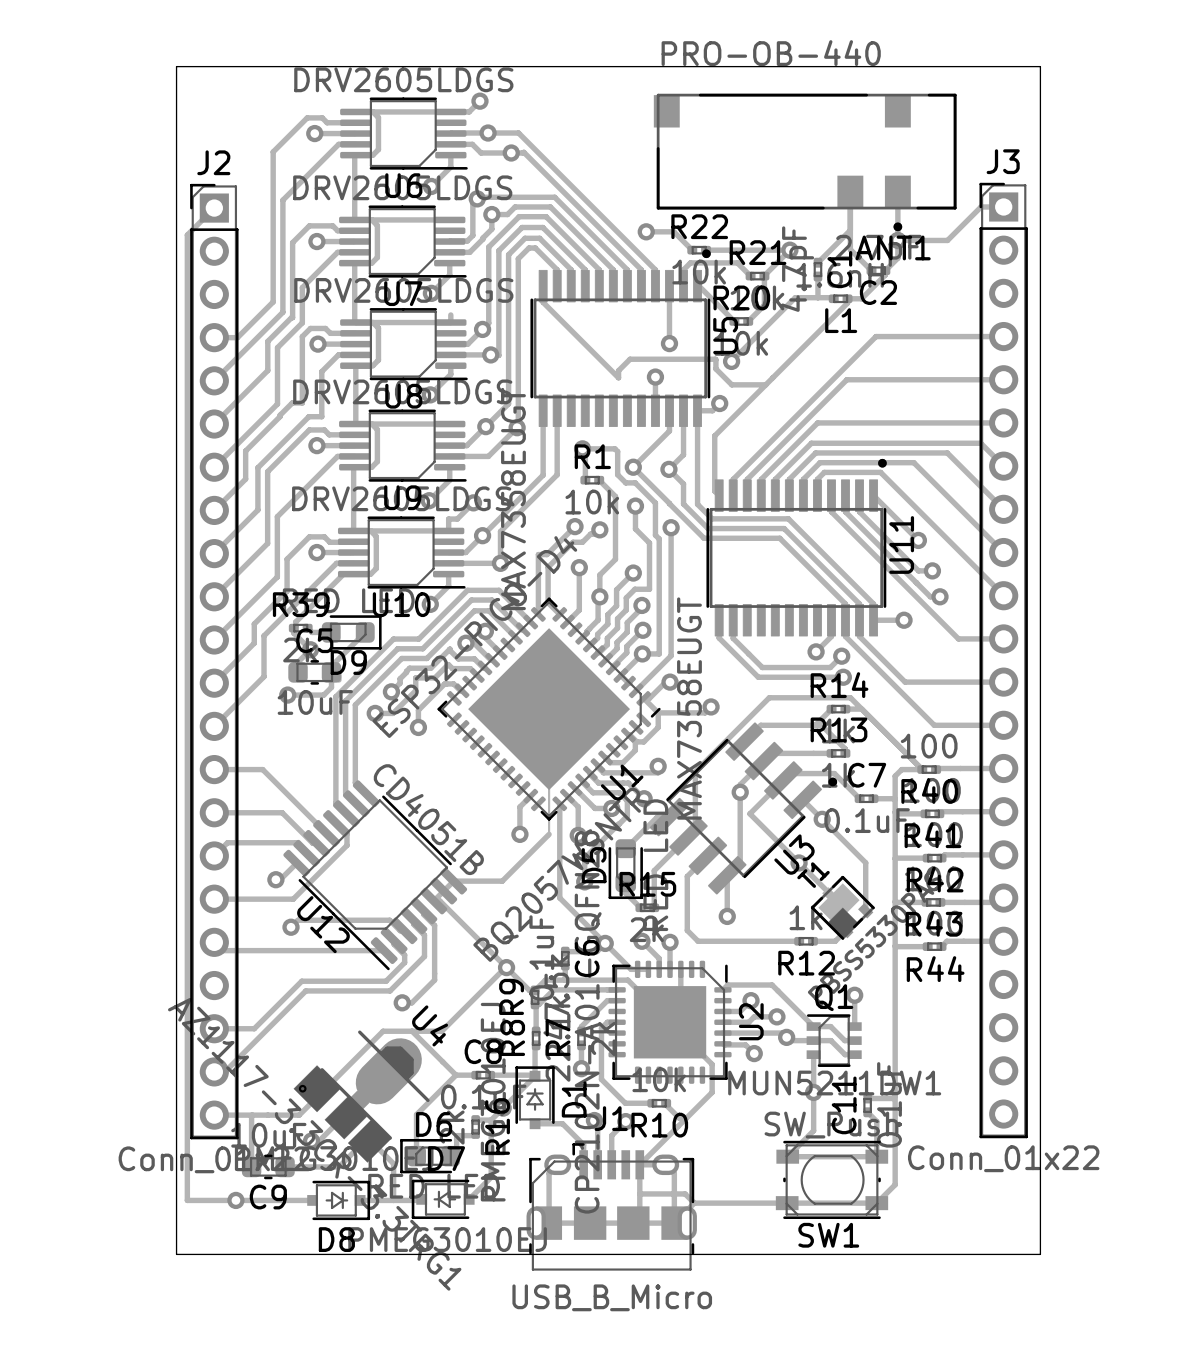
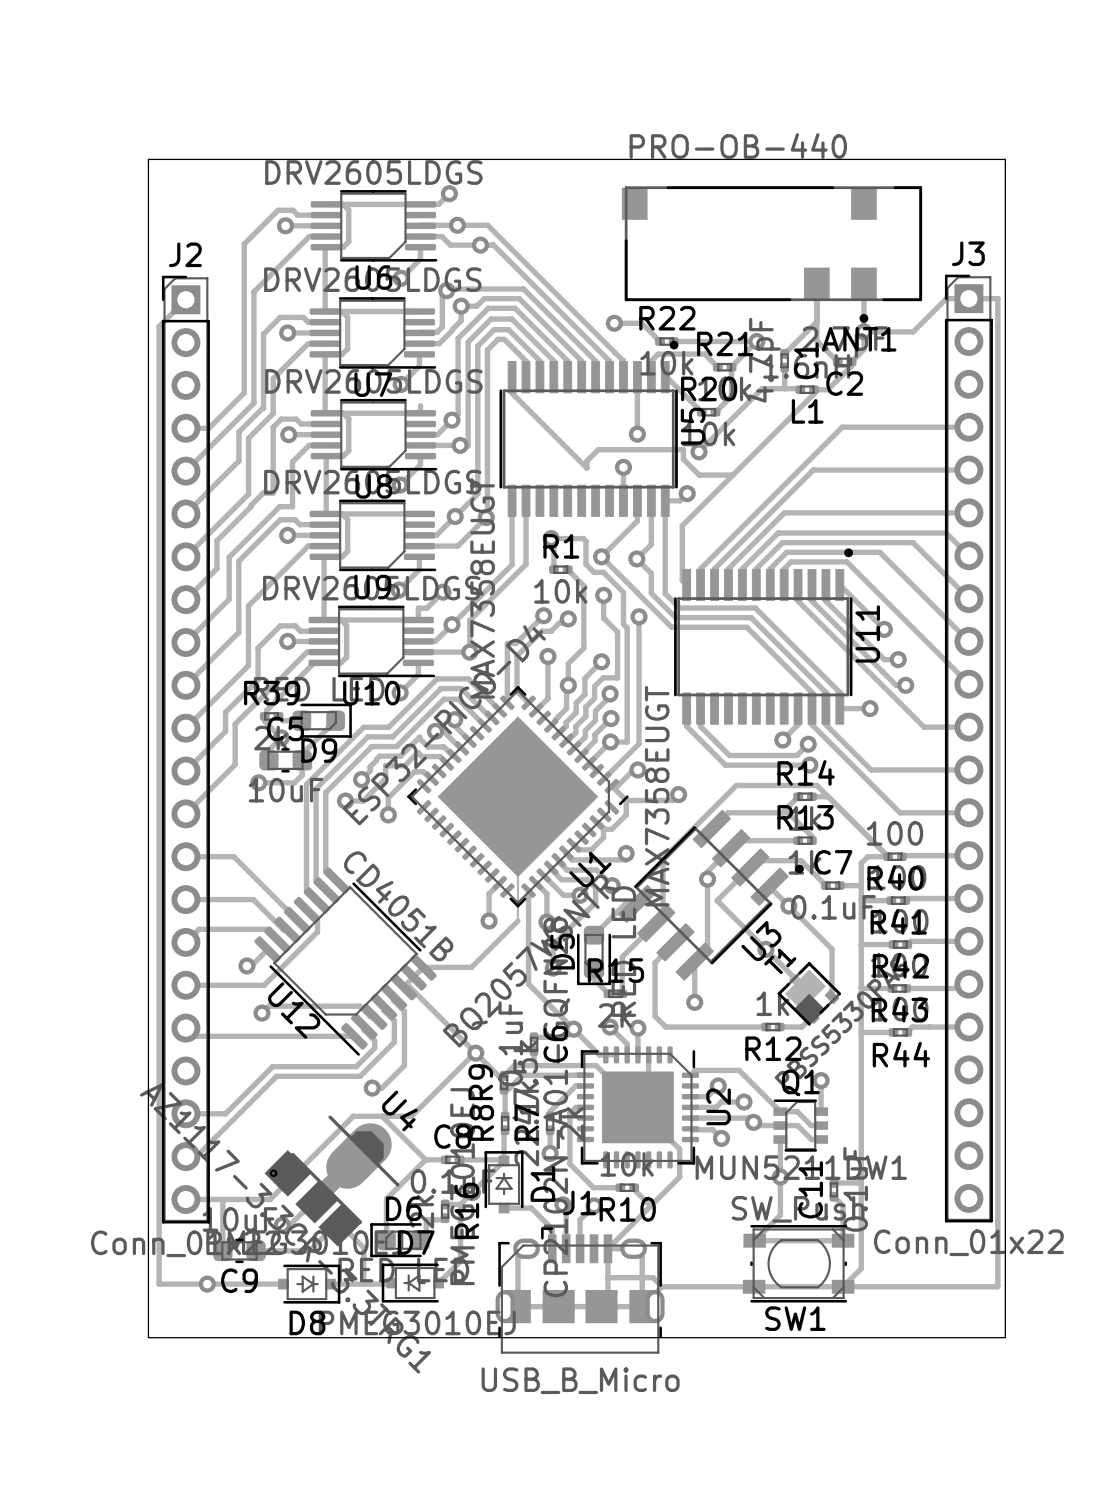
track: none -> (968, 298) (997, 298) (997, 1286) (843, 1286)

